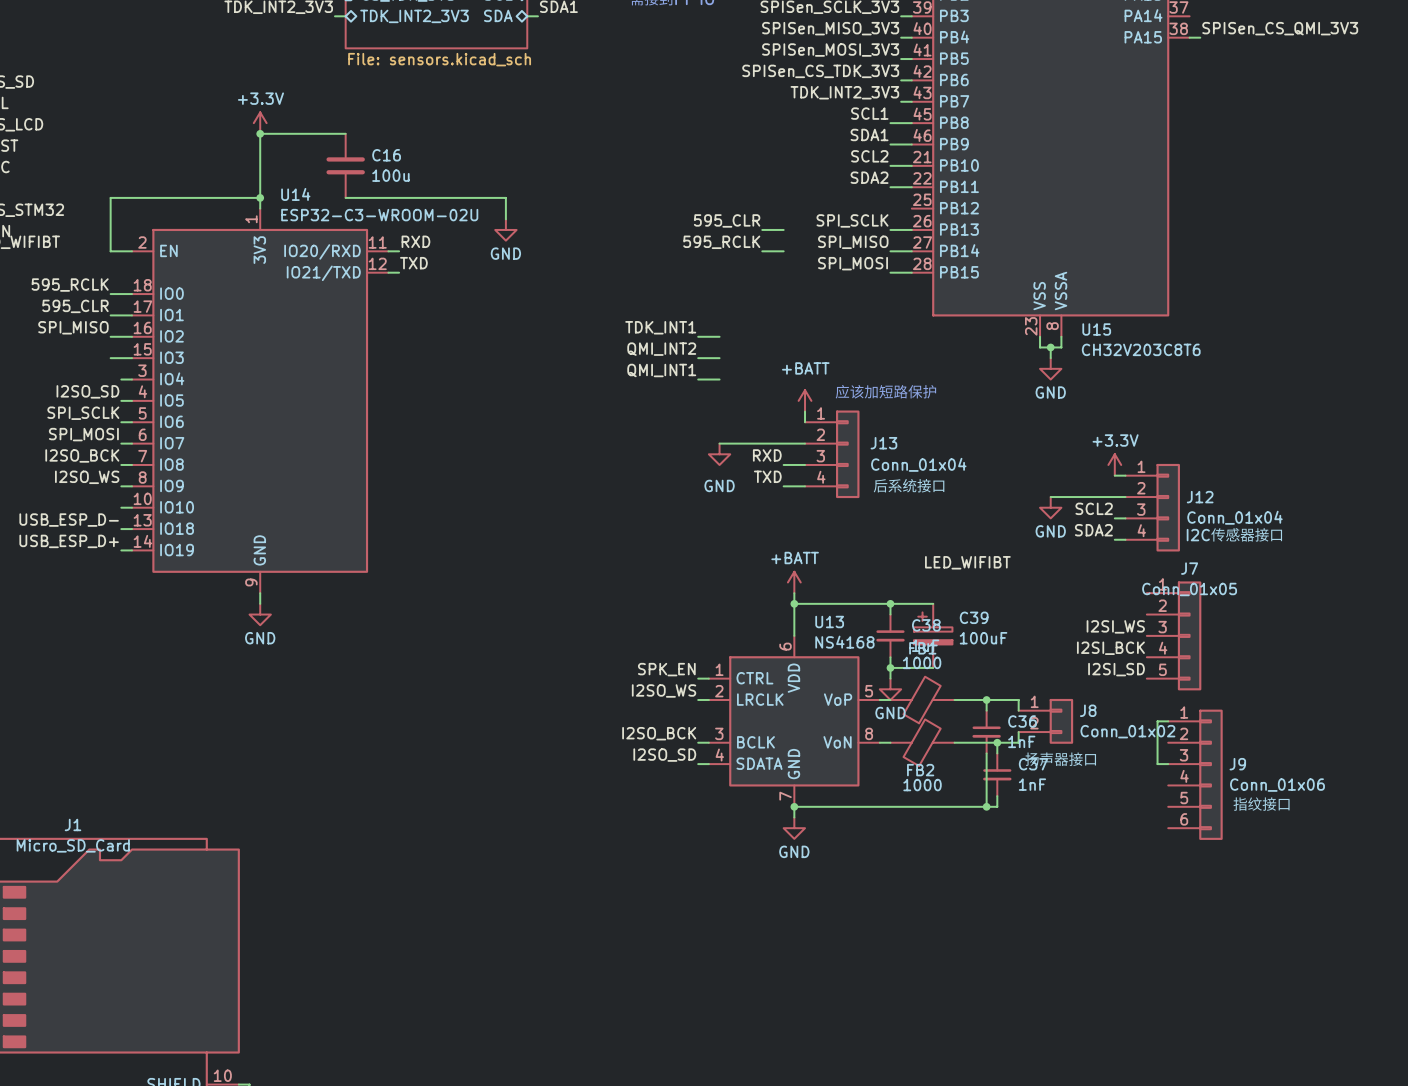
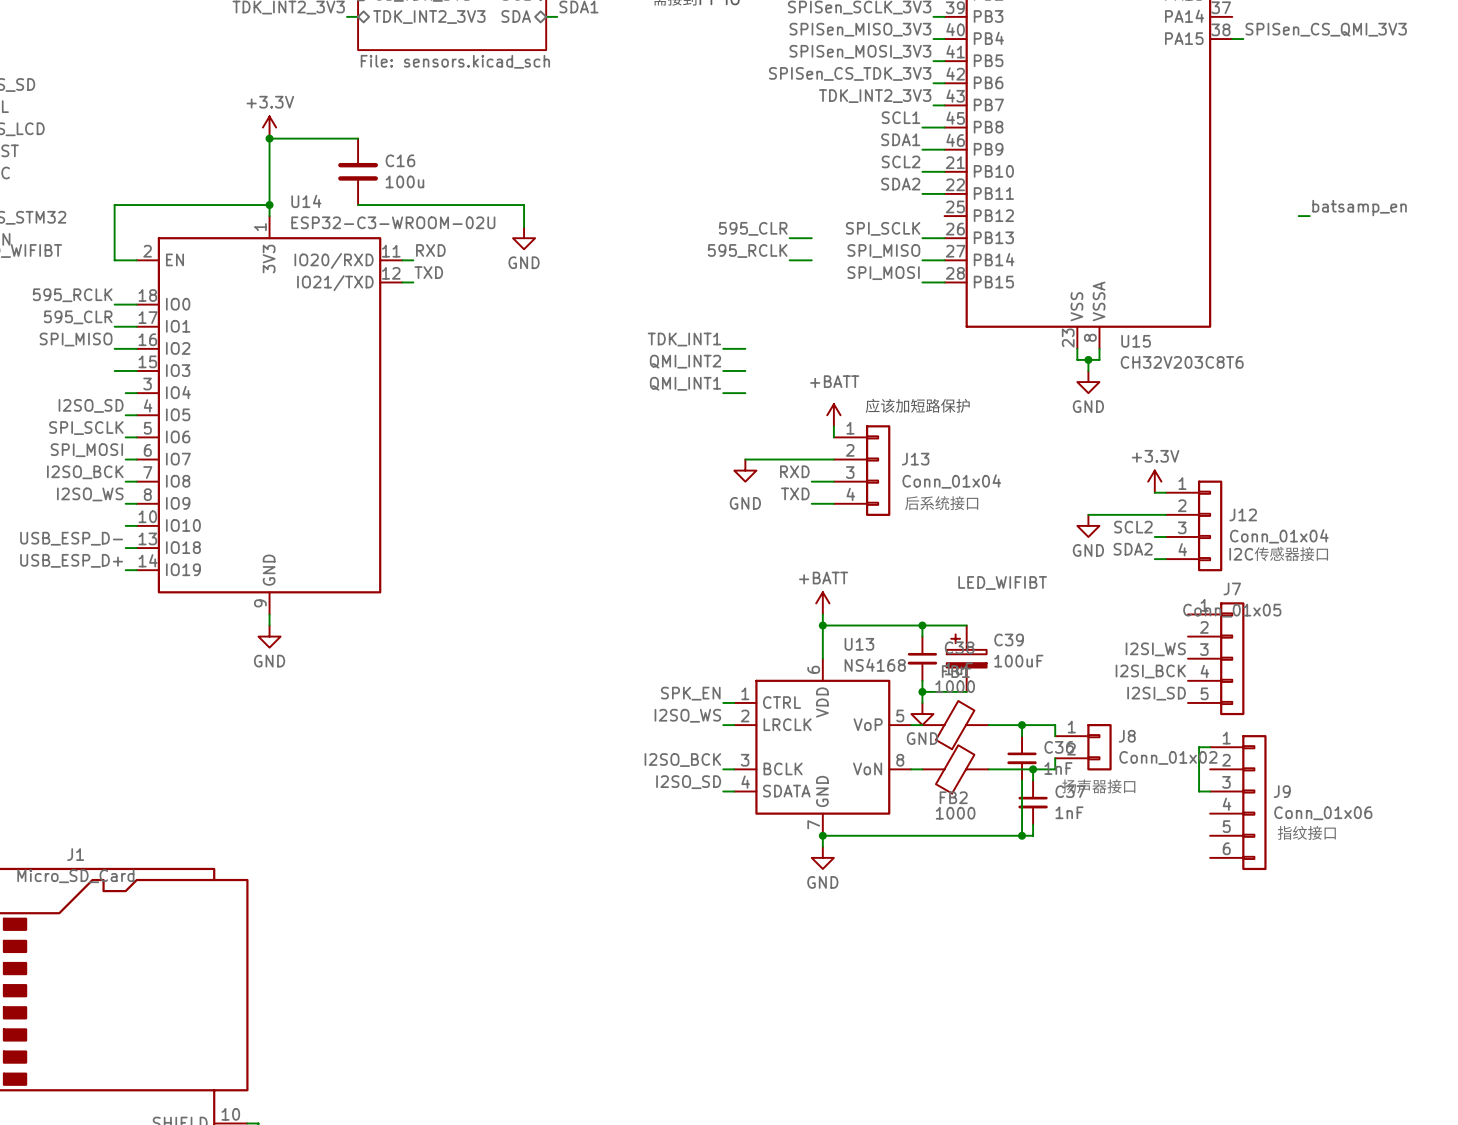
label: none -> batsamp_en (1359, 208)
wire: none -> (1298, 216) (1309, 216)

